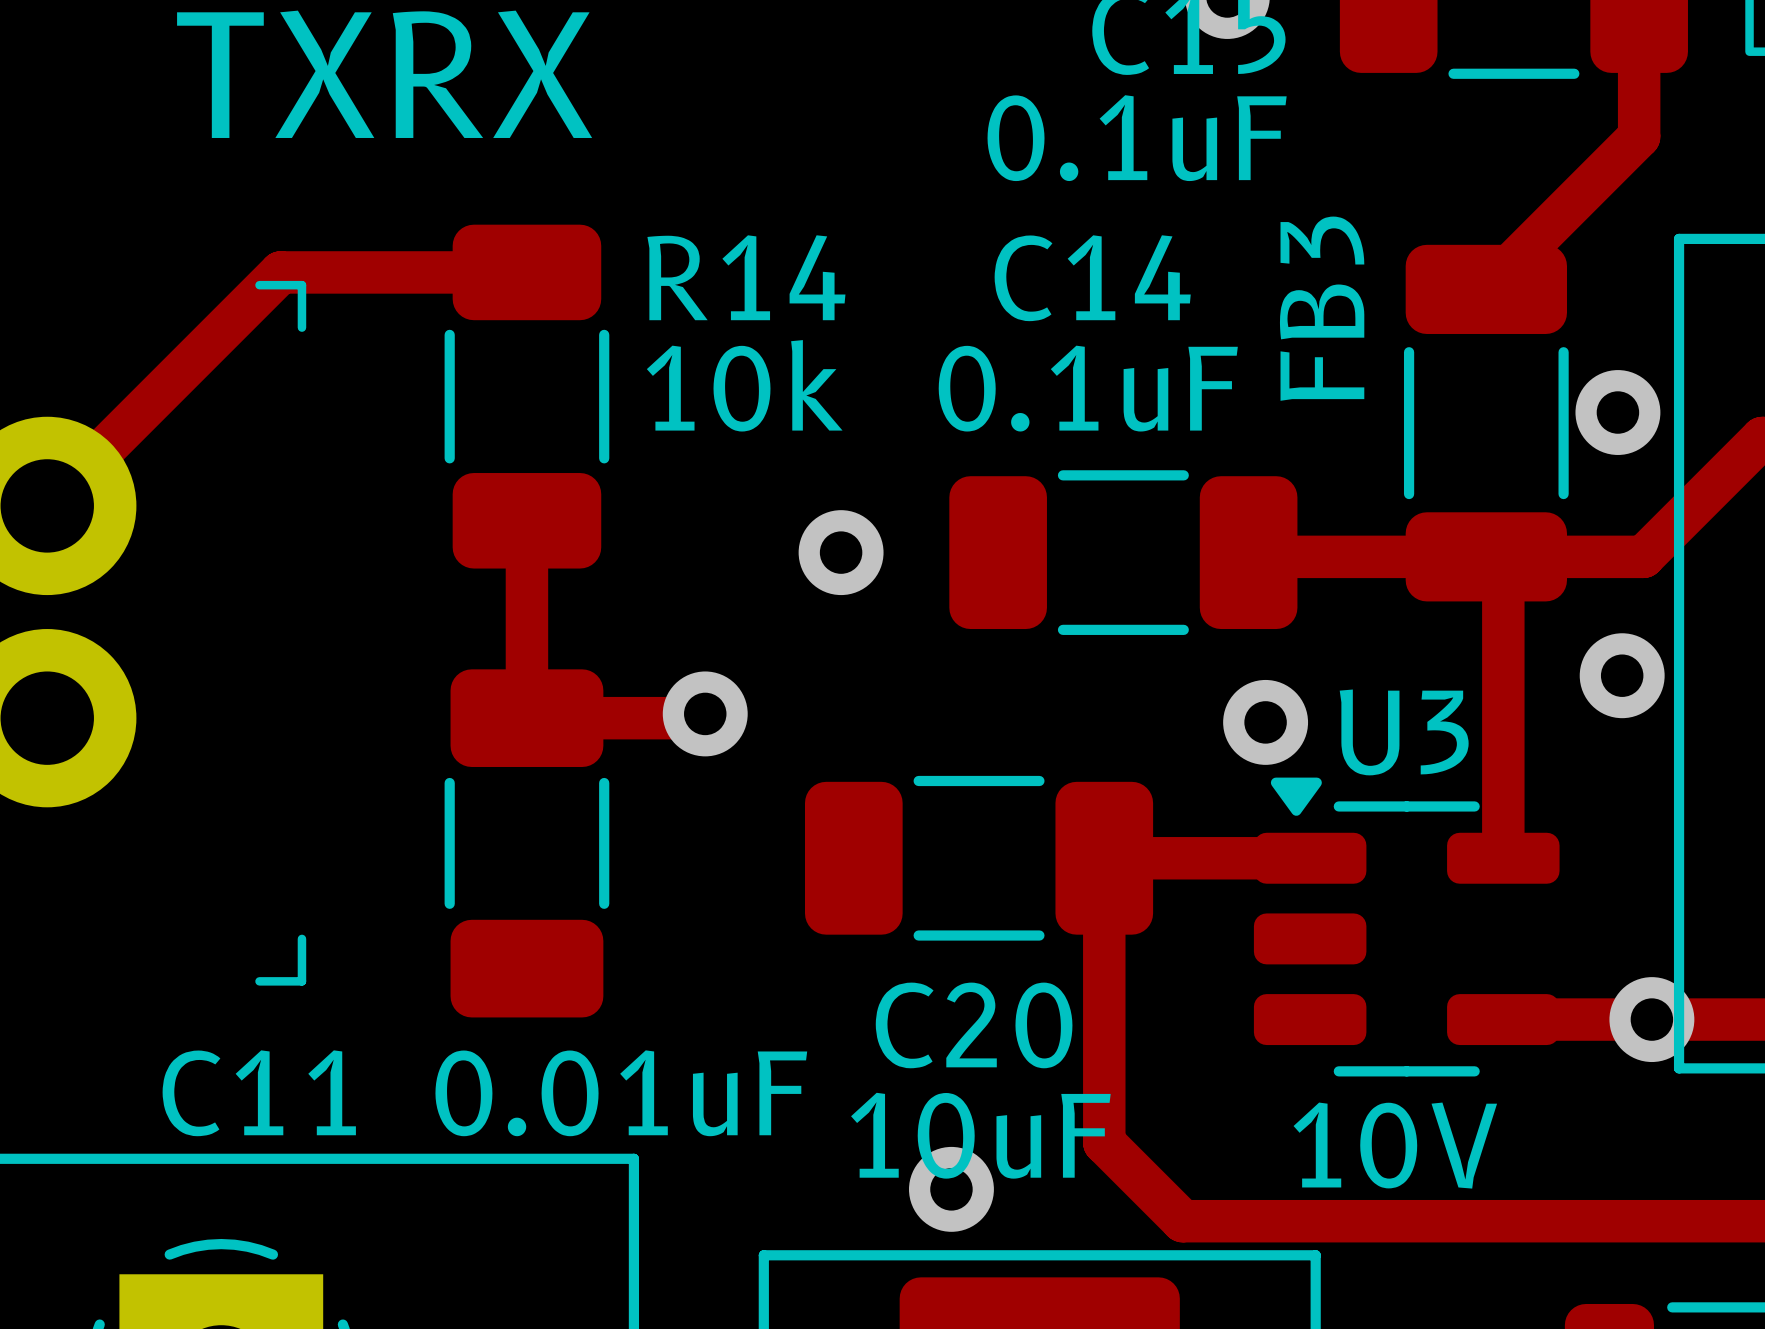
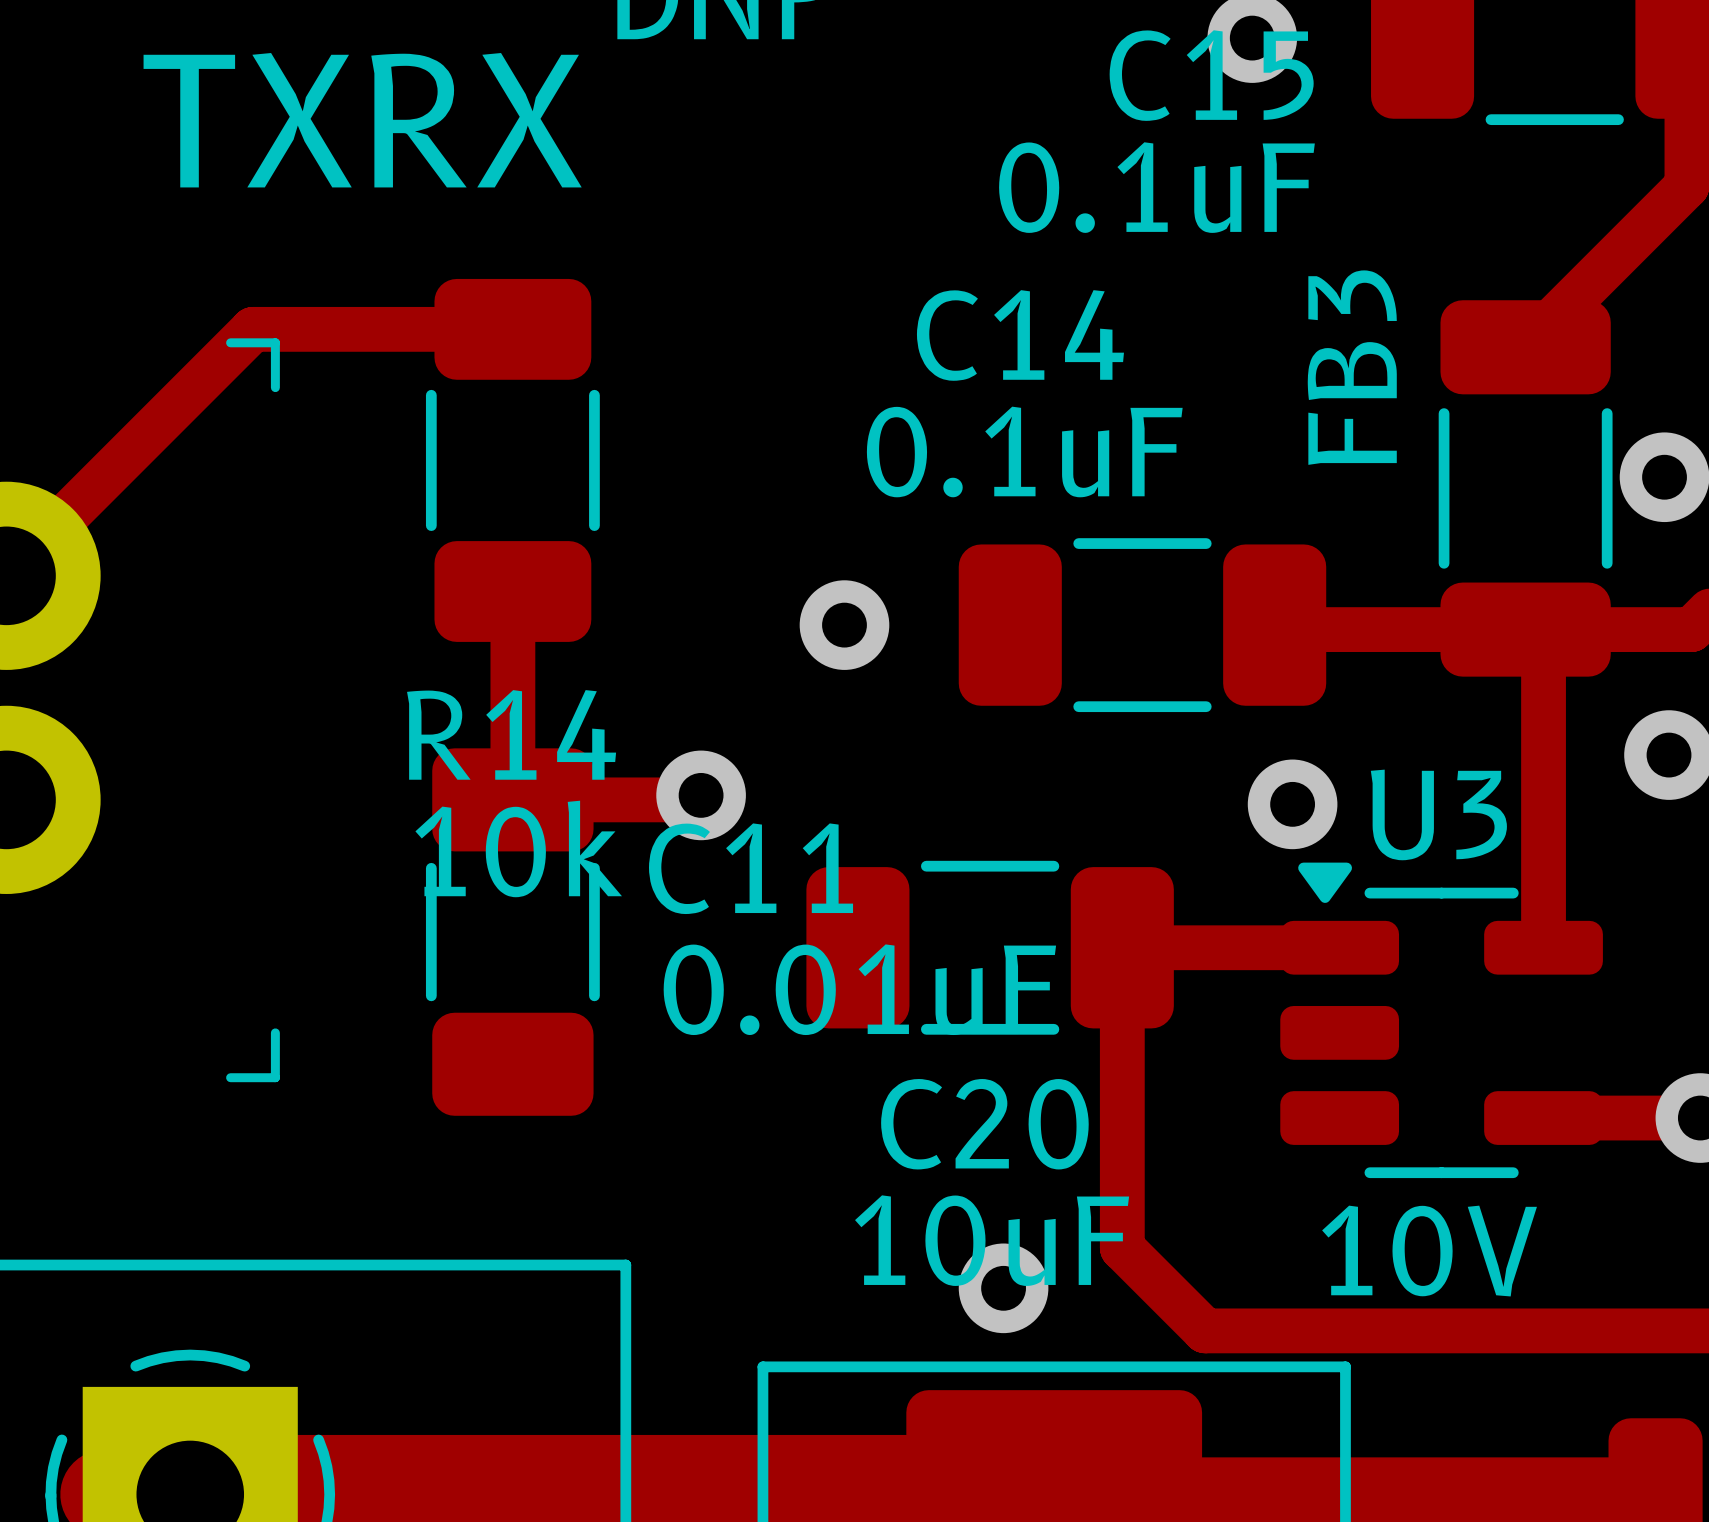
R14 name position: R14 (746, 277) -> R14 (511, 734)
C14 name position: C14 (1092, 278) -> C14 (1020, 335)
R14 value position: 10k (744, 385) -> 10k (518, 848)
C14 value position: 0.1uF (1088, 388) -> 0.1uF (1024, 451)
C11 name position: C11 (259, 1093) -> C11 (751, 868)
C11 value position: 0.01uF (621, 1093) -> 0.01uF (859, 989)
via position: (951, 1189) -> (1003, 1288)

